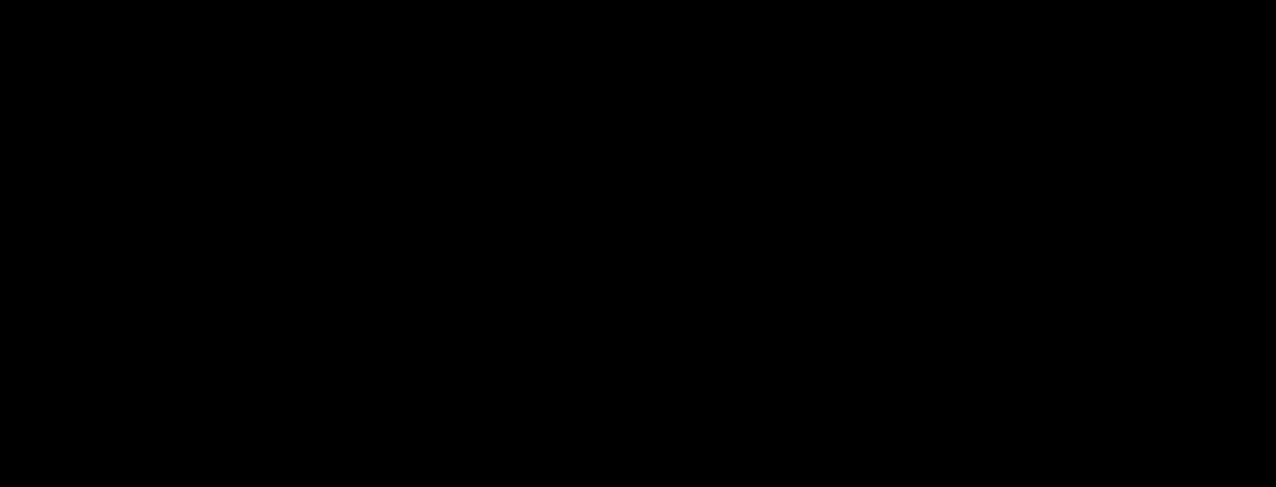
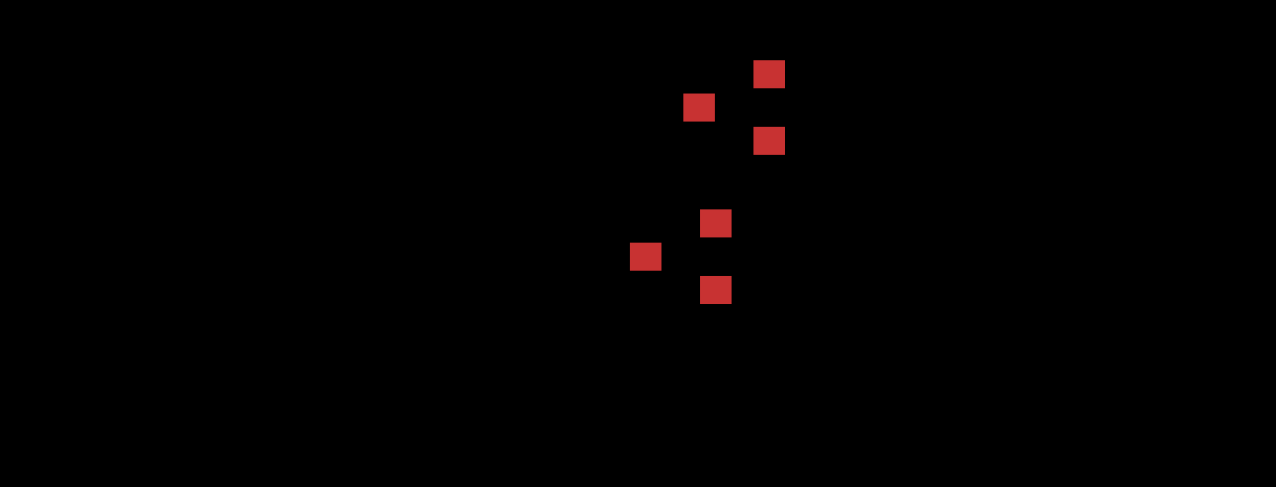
part: none -> (734, 107)
part: none -> (680, 256)

